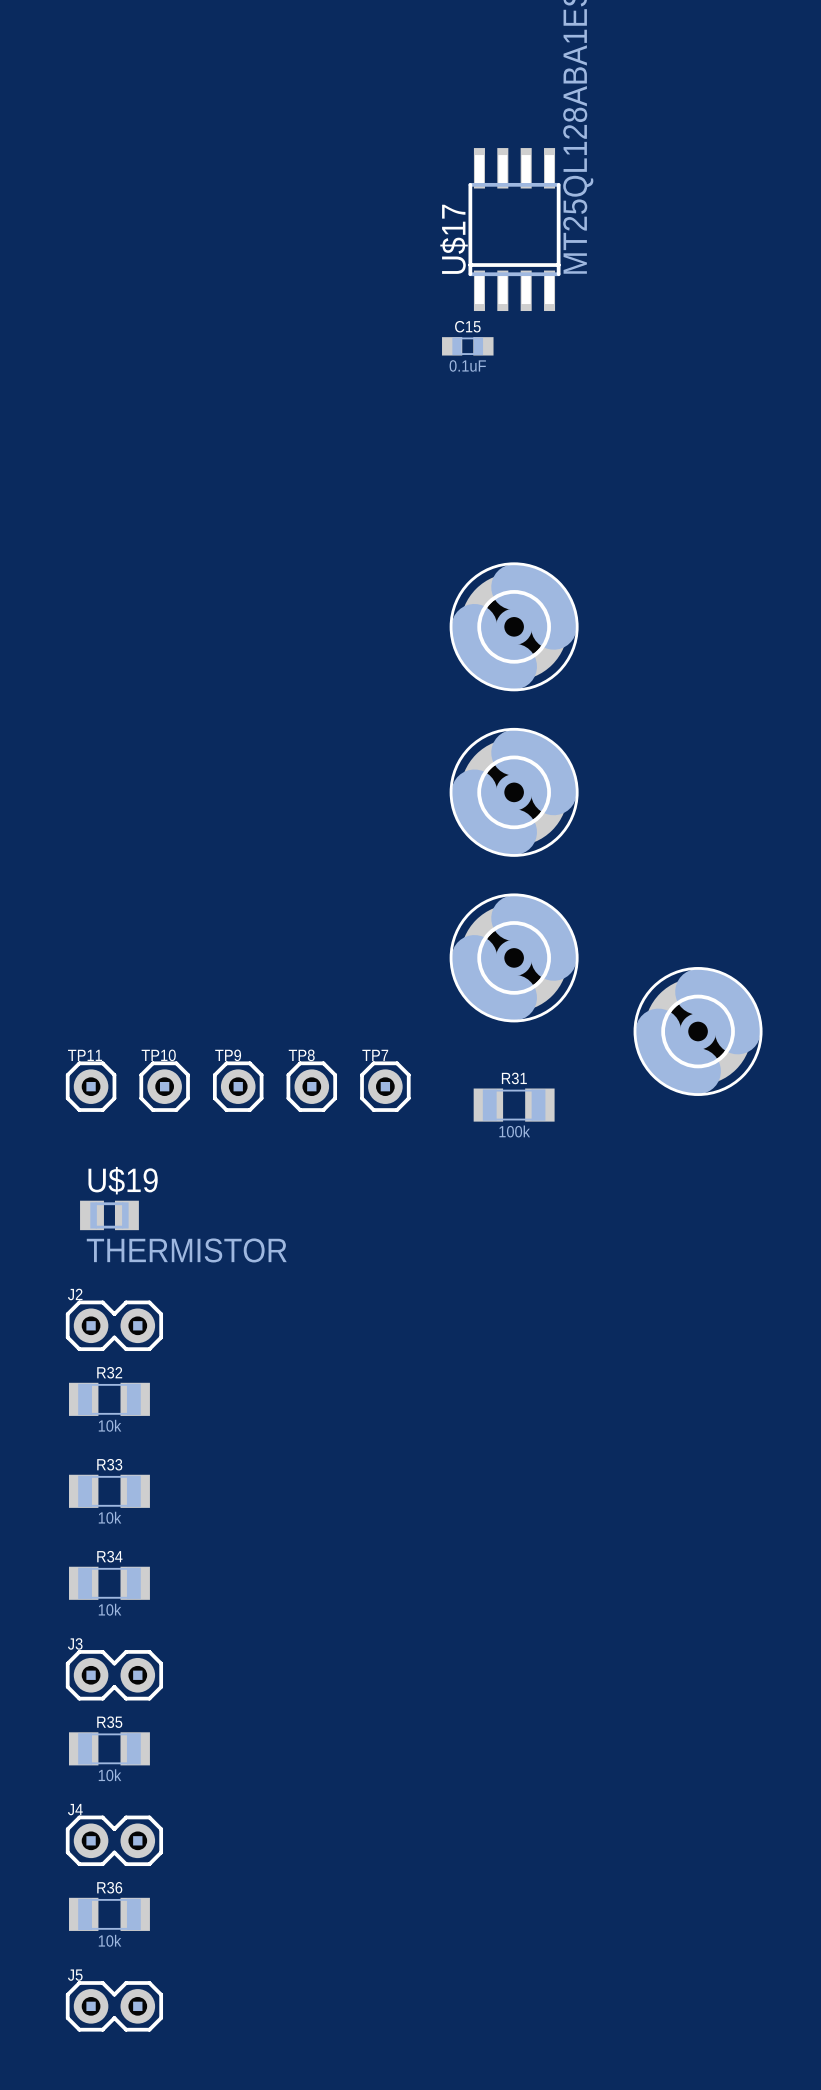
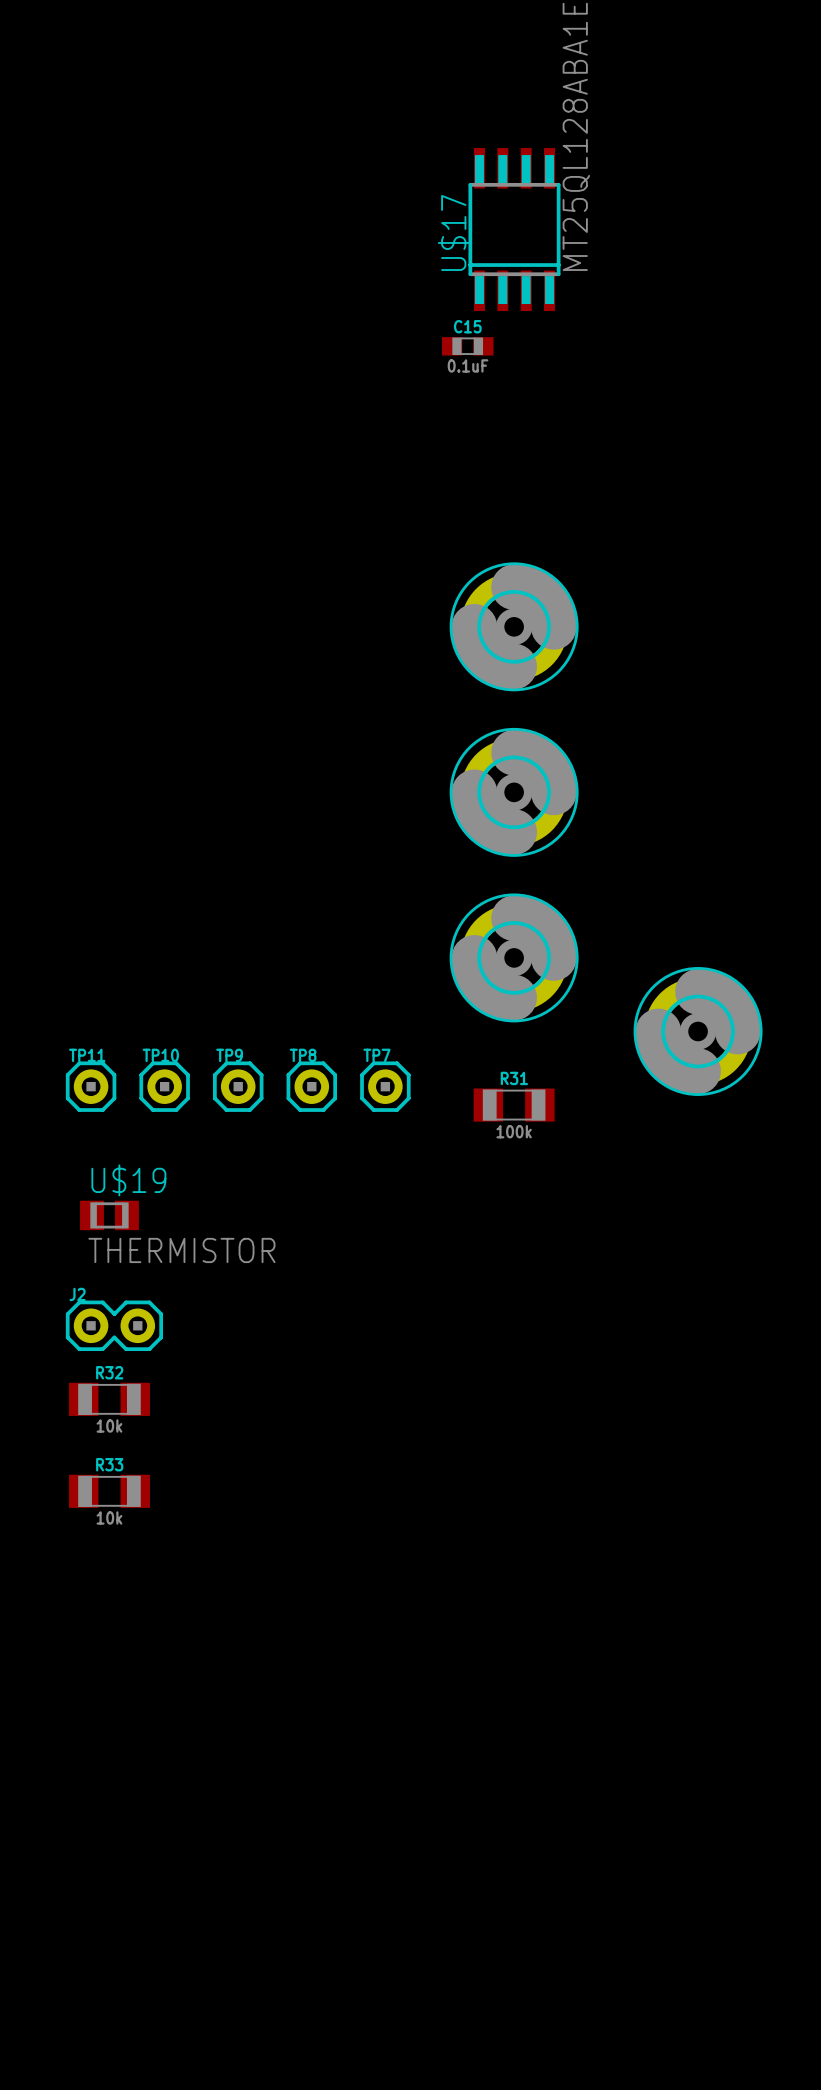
R34: 10k (109, 1583) -> none
J3: (114, 1675) -> none
R35: 10k (109, 1748) -> none
J4: (114, 1840) -> none
R36: 10k (109, 1914) -> none
J5: (114, 2006) -> none

